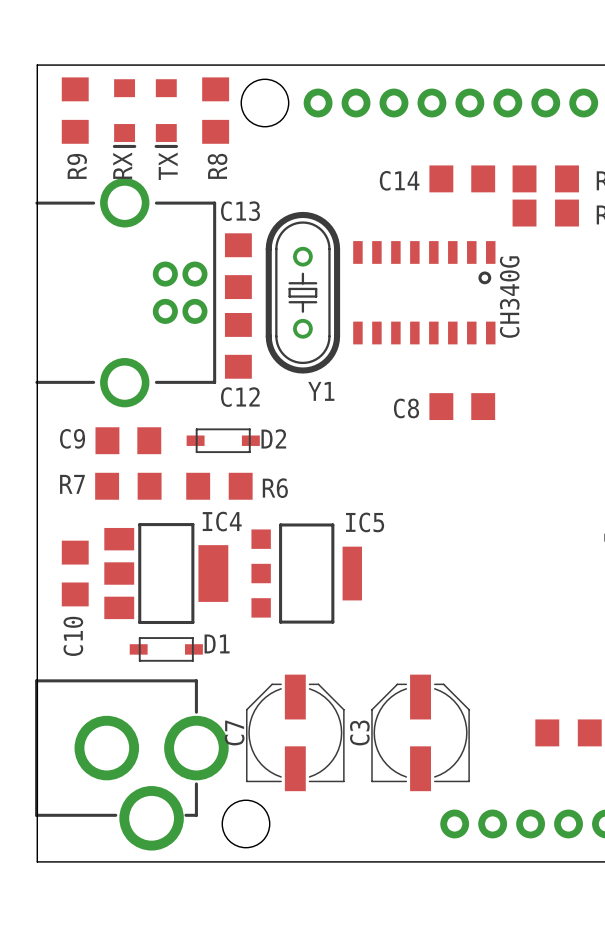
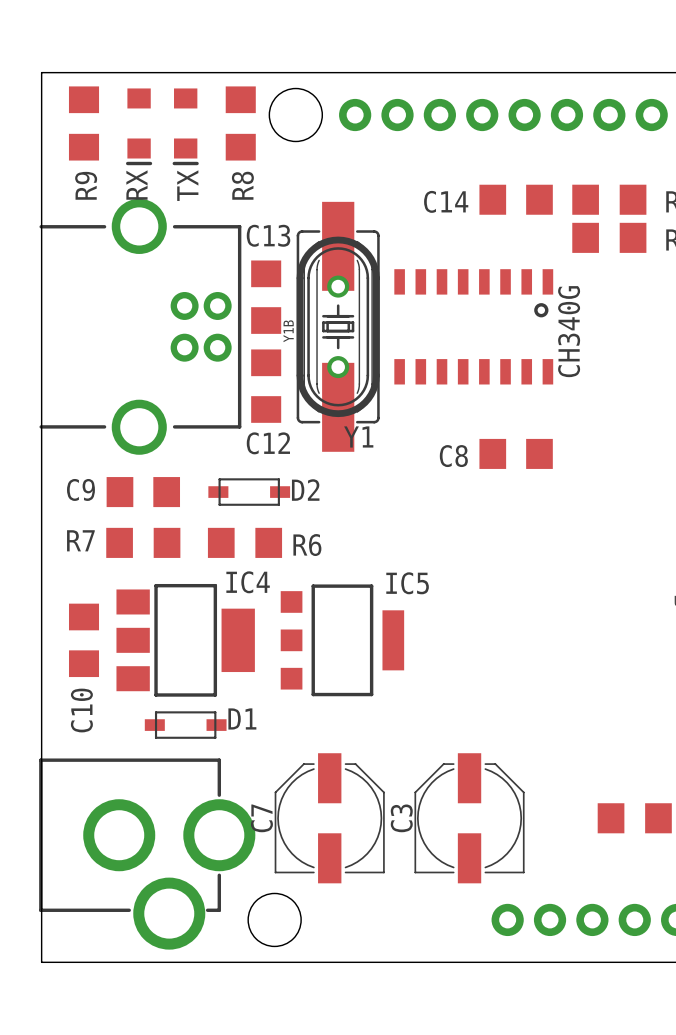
Y1B: none -> (338, 326)

